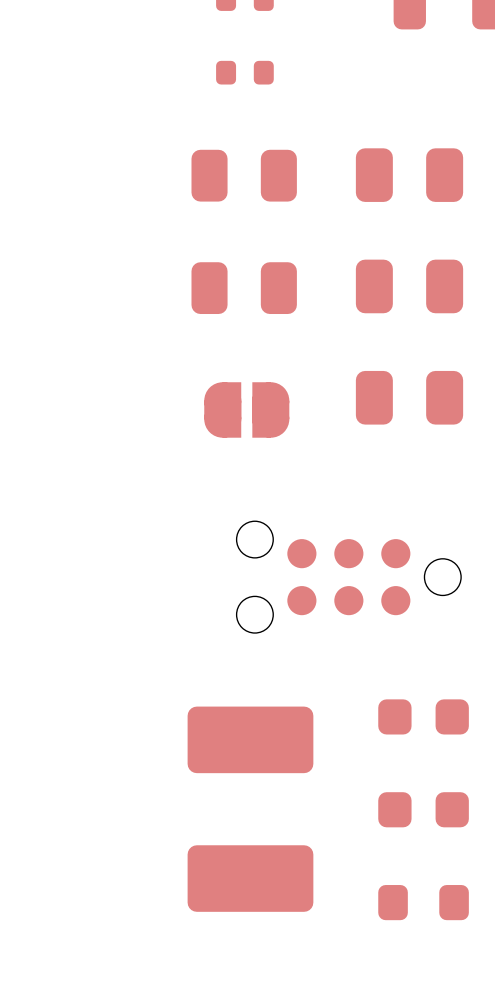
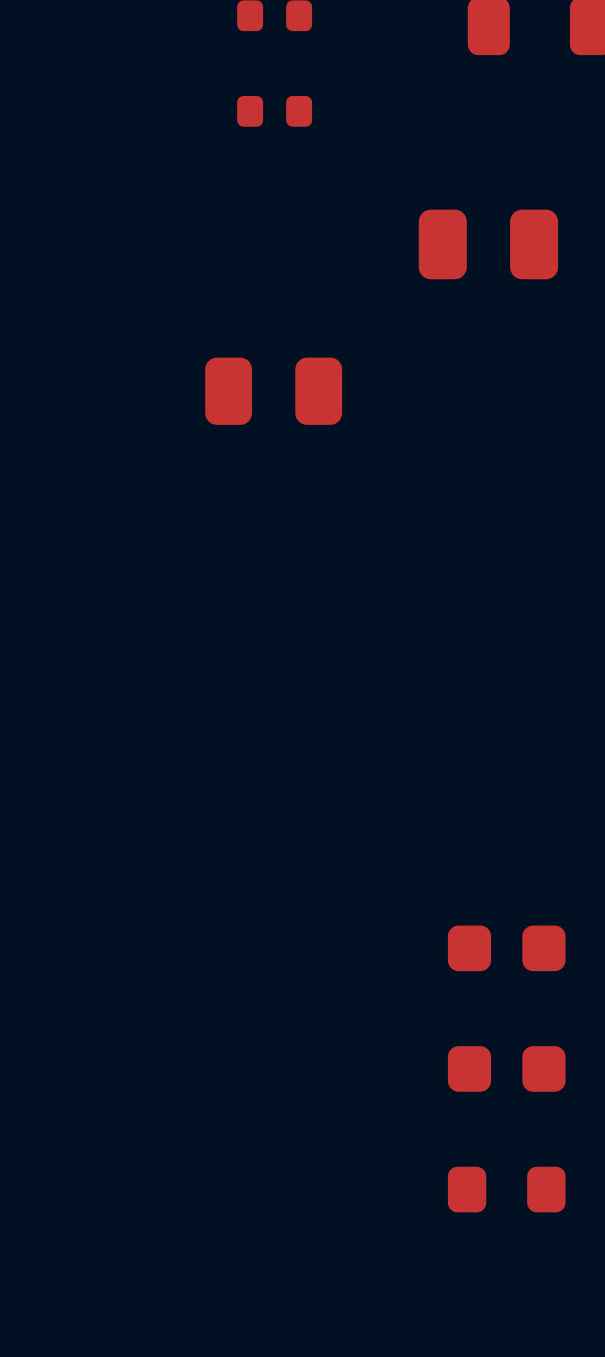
part: (244, 175) -> none
part: (409, 286) -> none
part: (409, 397) -> none
part: (246, 409) -> none
part: (348, 577) -> none
part: (250, 739) -> none
part: (250, 878) -> none

